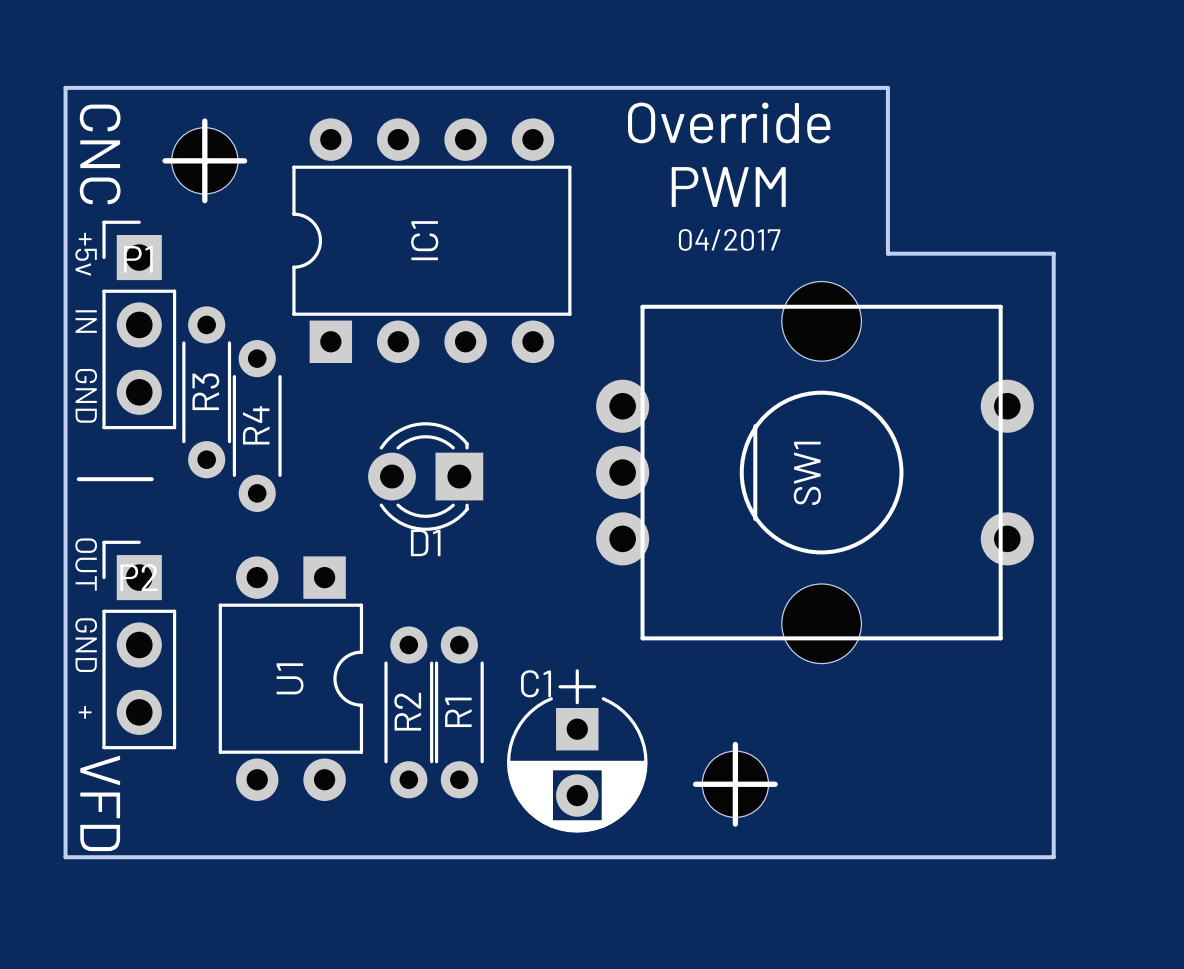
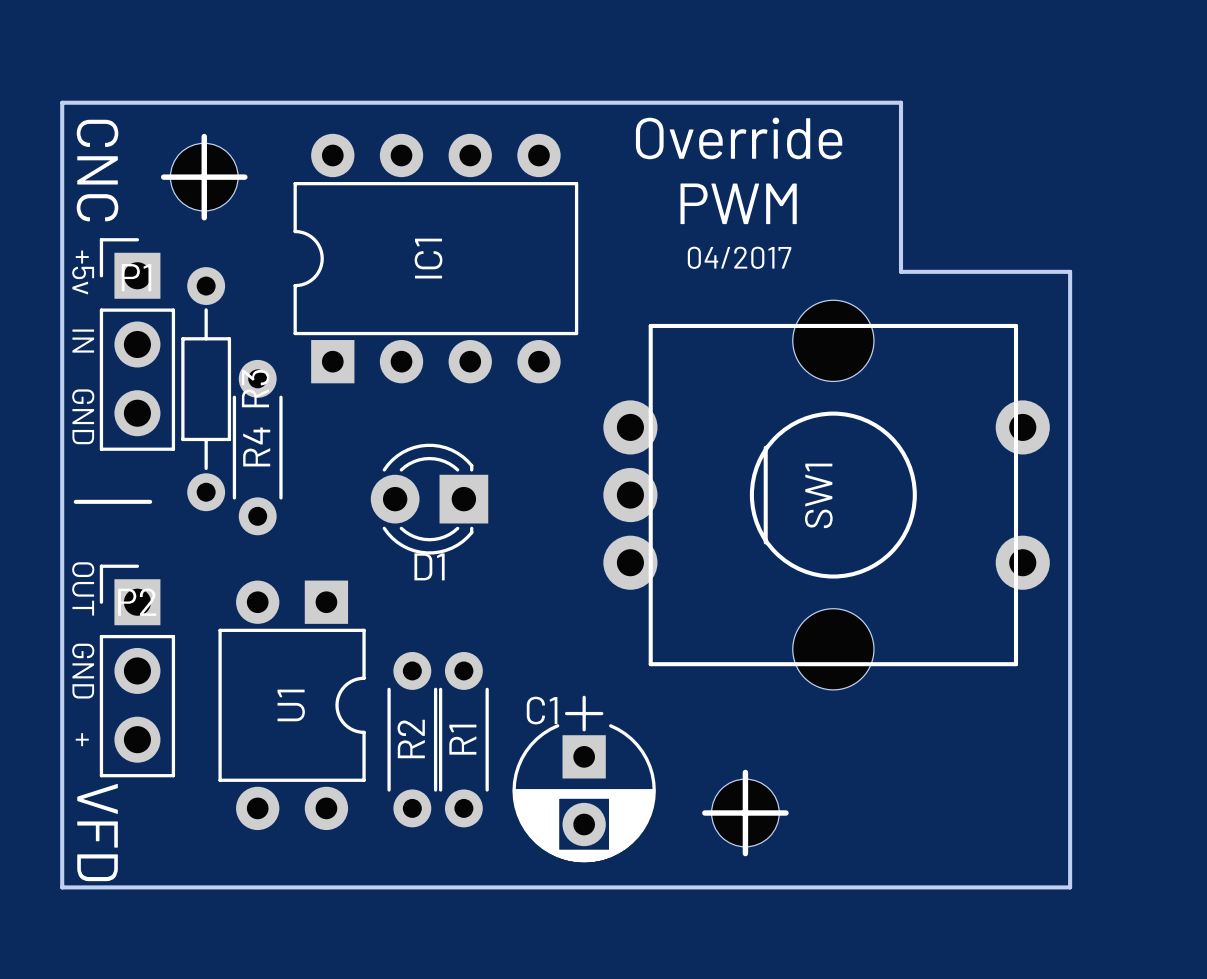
R3 footprint: [182, 306, 232, 479] -> [181, 267, 232, 512]

